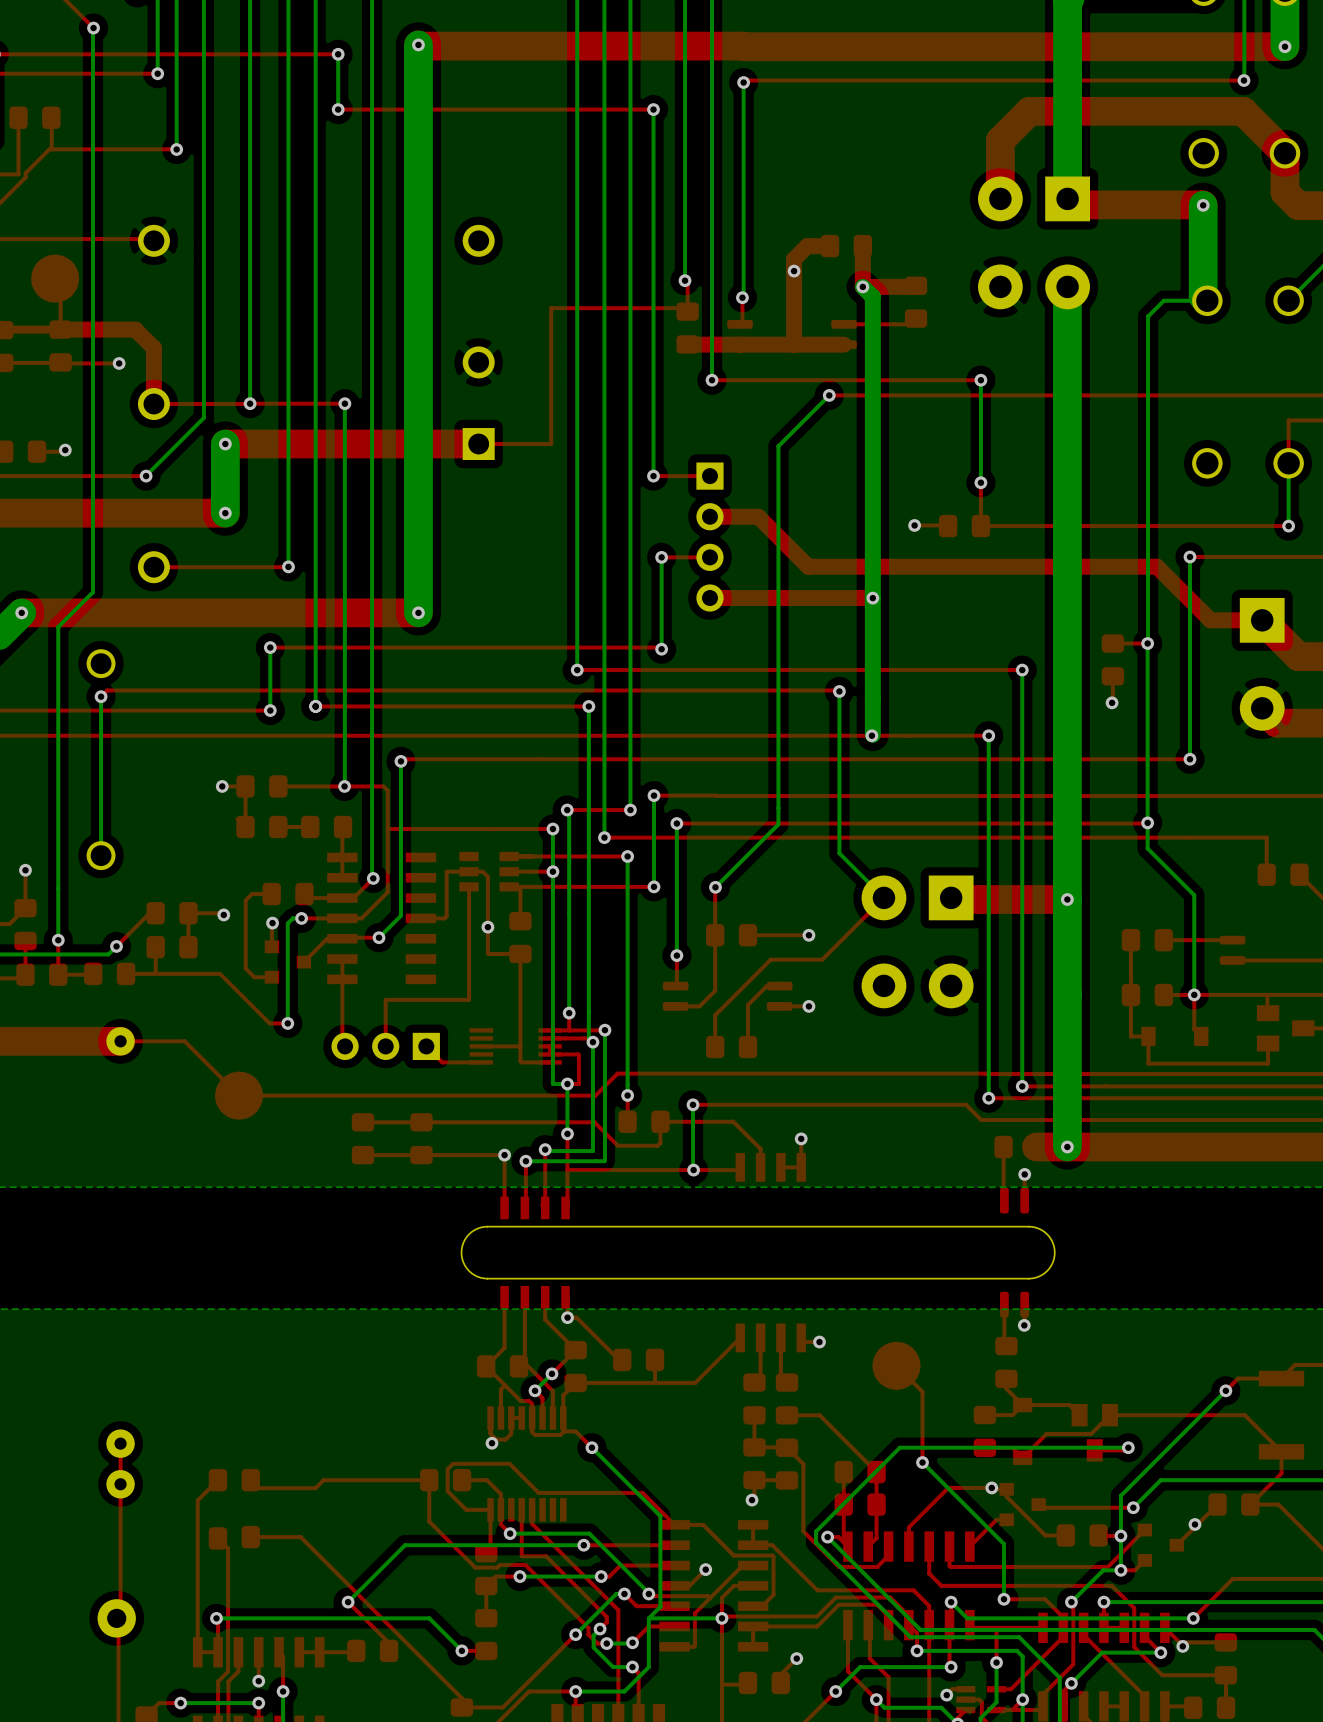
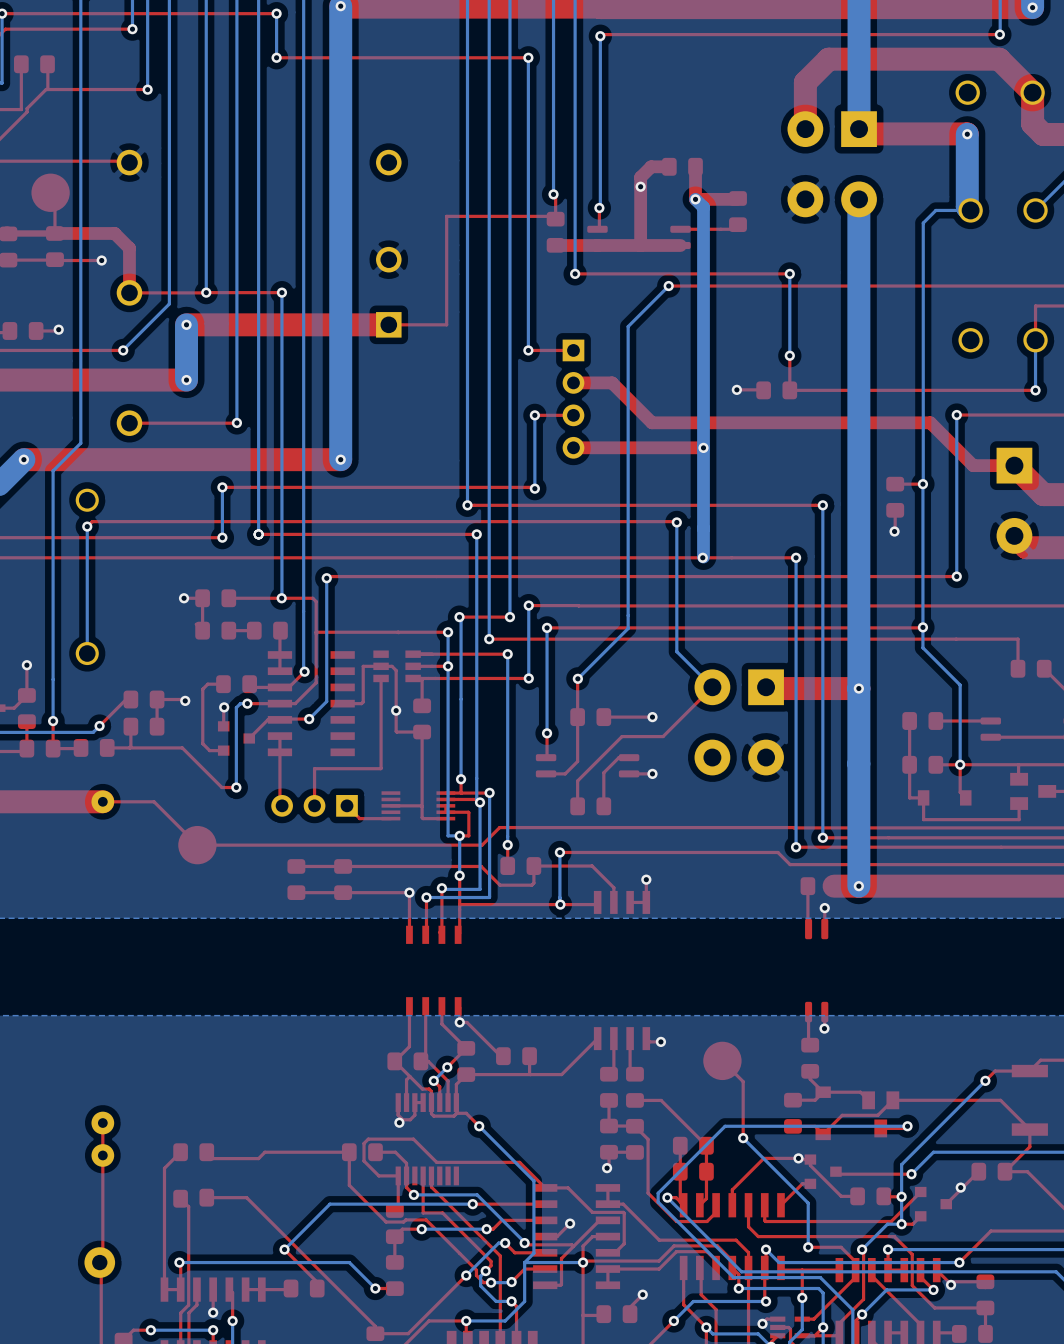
board edge: (1028, 1226) (487, 1226) (477, 1228) (469, 1234) (463, 1242) (461, 1252) (463, 1262) (469, 1271) (477, 1276) (487, 1278) (1028, 1278) (1038, 1276) (1047, 1271) (1052, 1262) (1054, 1252) (1052, 1242) (1047, 1234) (1038, 1228) (1028, 1226) -> none

